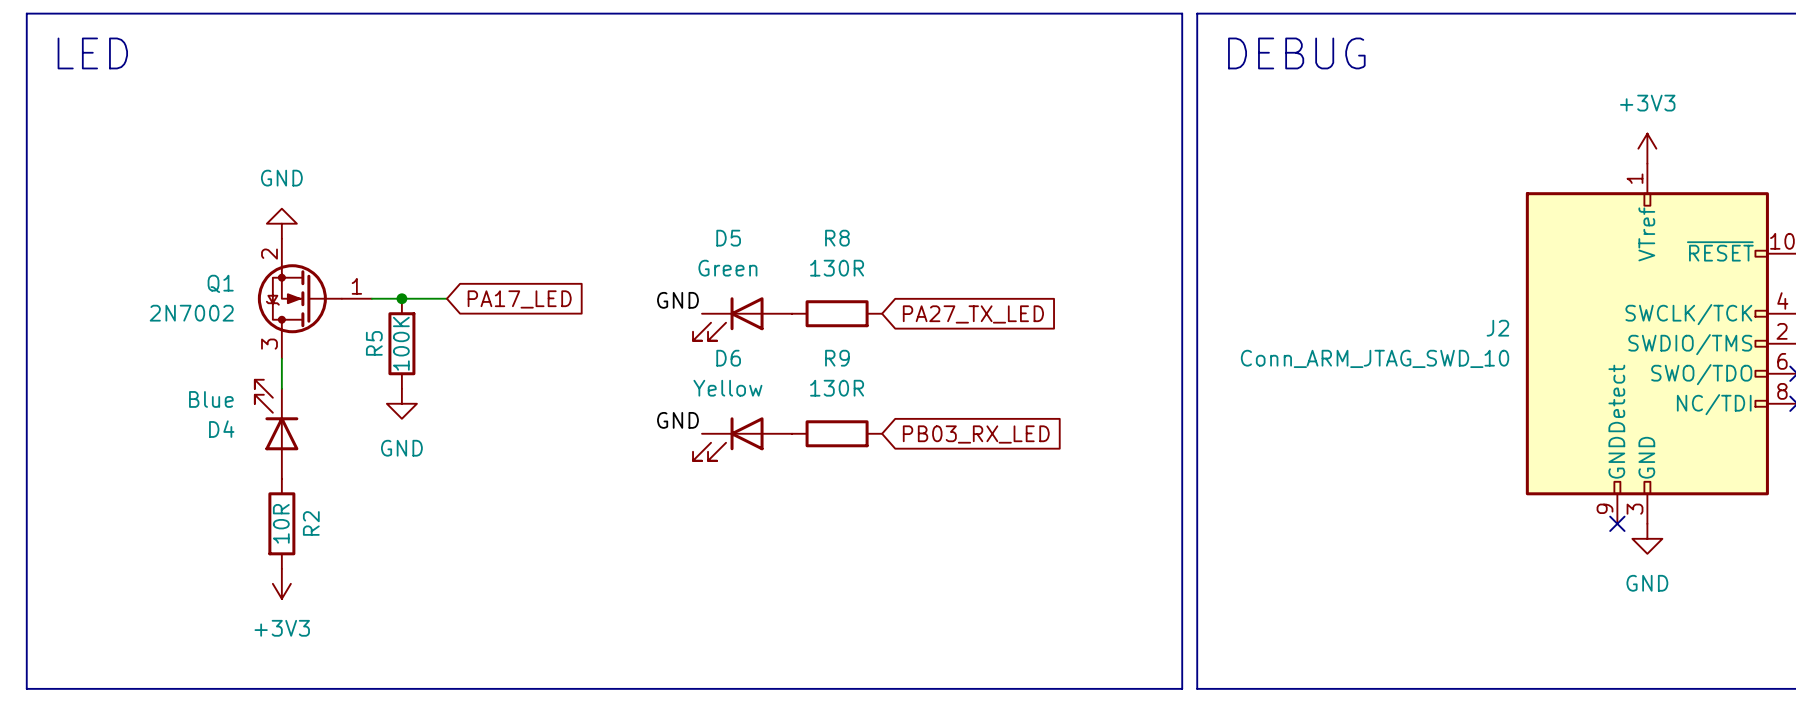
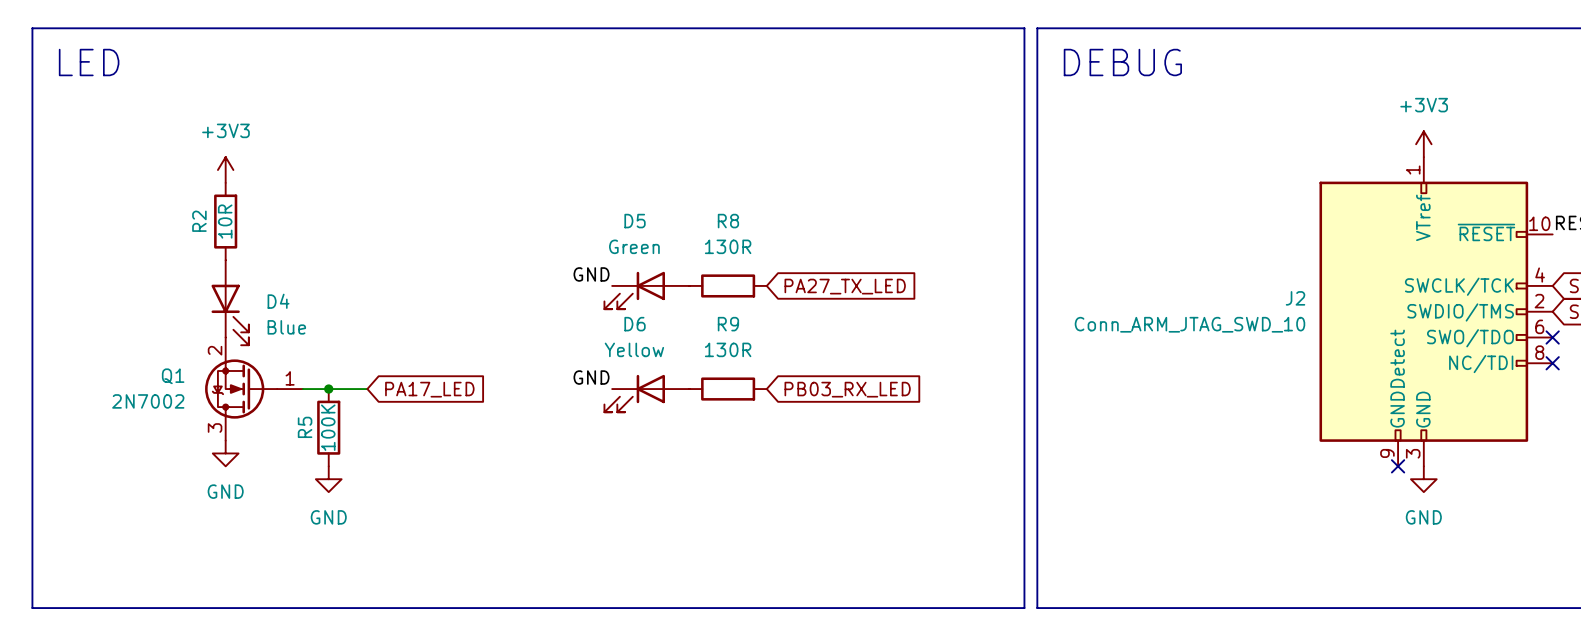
power symbol: none -> +3V3 (225, 170)
power symbol: GND (281, 223) -> none
Q1 position: (314, 298) -> (254, 389)
wire: (371, 298) (446, 298) -> (302, 389) (367, 389)
junction: (401, 298) -> none
global label position: PA17_LED (519, 299) -> PA17_LED (429, 389)
R5 position: (401, 343) -> (328, 427)
wire: (281, 358) (281, 388) -> none
power symbol: GND (401, 403) -> none
D4 rotation: 0° (276, 415) -> 180° (230, 314)
D4 position: (276, 429) -> (230, 302)
junction: none -> (328, 389)
power symbol: none -> GND (225, 453)
R2 position: (281, 523) -> (225, 221)
R2 name position: R2 (311, 523) -> R2 (199, 221)
power symbol: none -> GND (328, 479)
power symbol: +3V3 (281, 583) -> none

